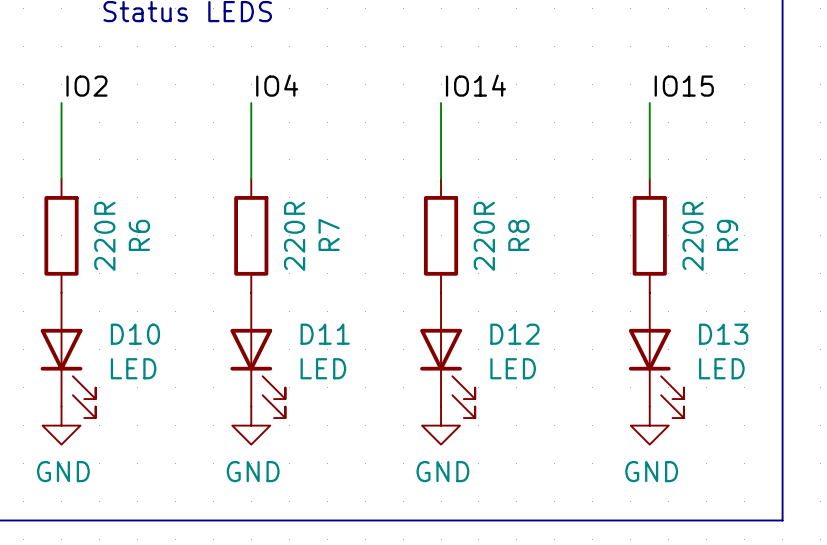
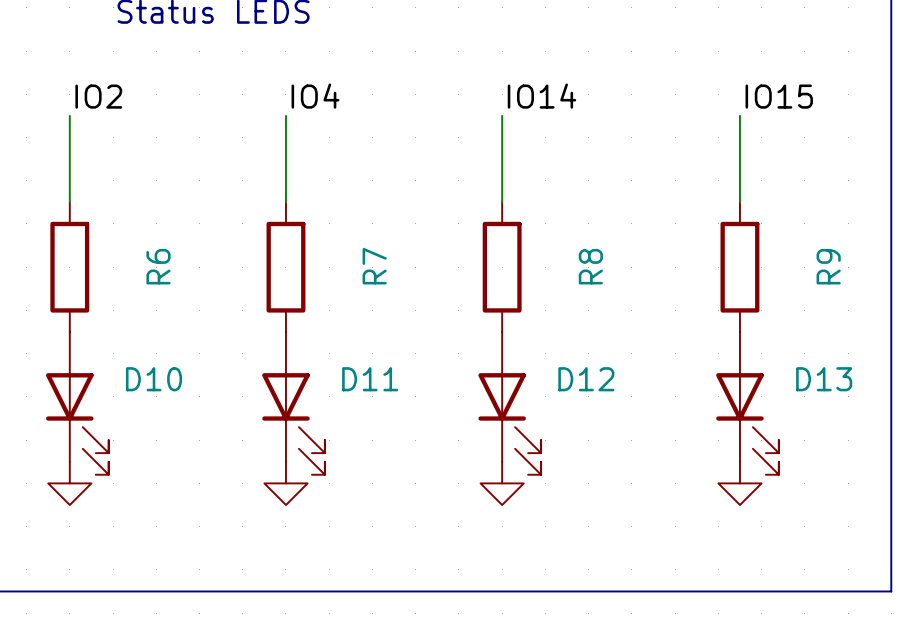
R6 value: 220R (104, 236) -> none
R7 value: 220R (294, 236) -> none
R8 value: 220R (484, 236) -> none
R9 value: 220R (693, 236) -> none
D10 value: LED (133, 368) -> none
D11 value: LED (323, 368) -> none
D12 value: LED (513, 368) -> none
D13 value: LED (721, 368) -> none
power symbol text: GND (63, 471) -> none
power symbol text: GND (253, 471) -> none
power symbol text: GND (442, 471) -> none
power symbol text: GND (651, 471) -> none

